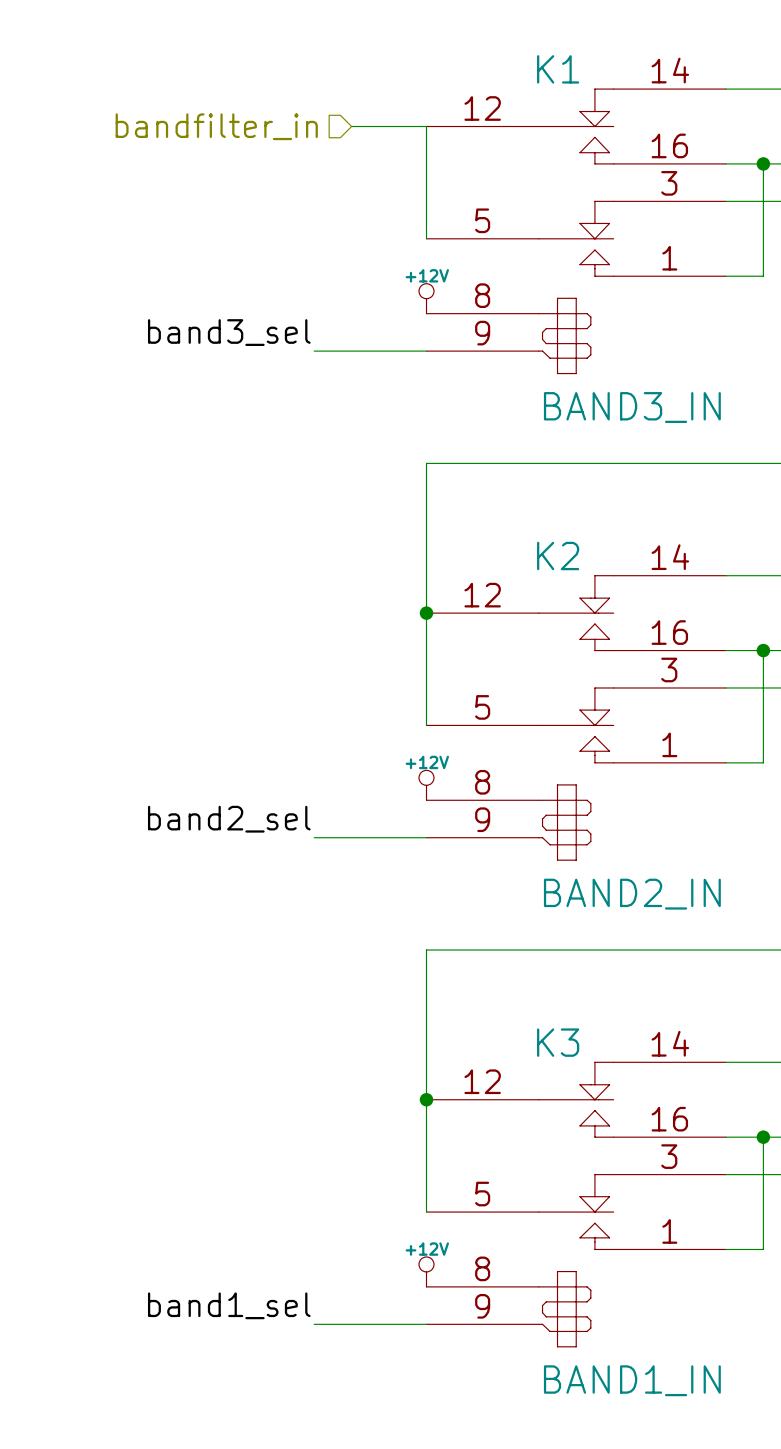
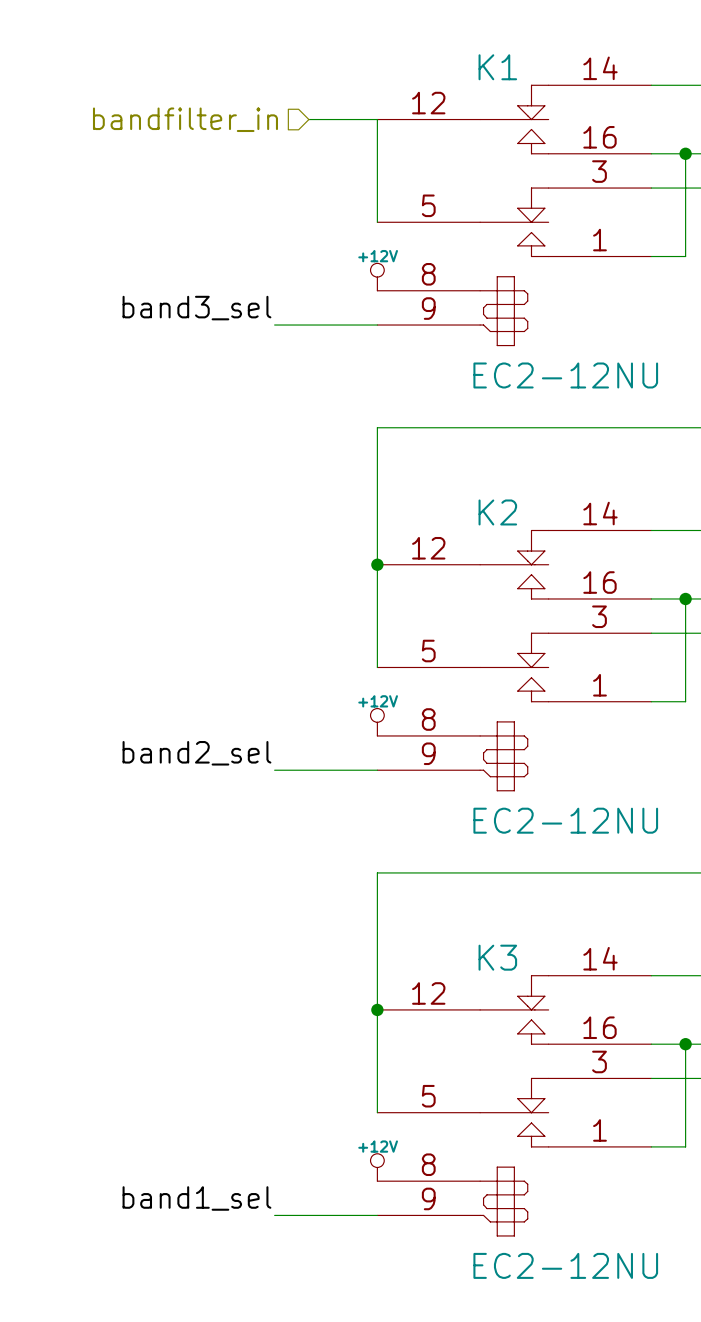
K1 value: BAND3_IN (632, 407) -> EC2-12NU (565, 375)
K2 value: BAND2_IN (632, 894) -> EC2-12NU (565, 820)
K3 value: BAND1_IN (632, 1380) -> EC2-12NU (565, 1265)

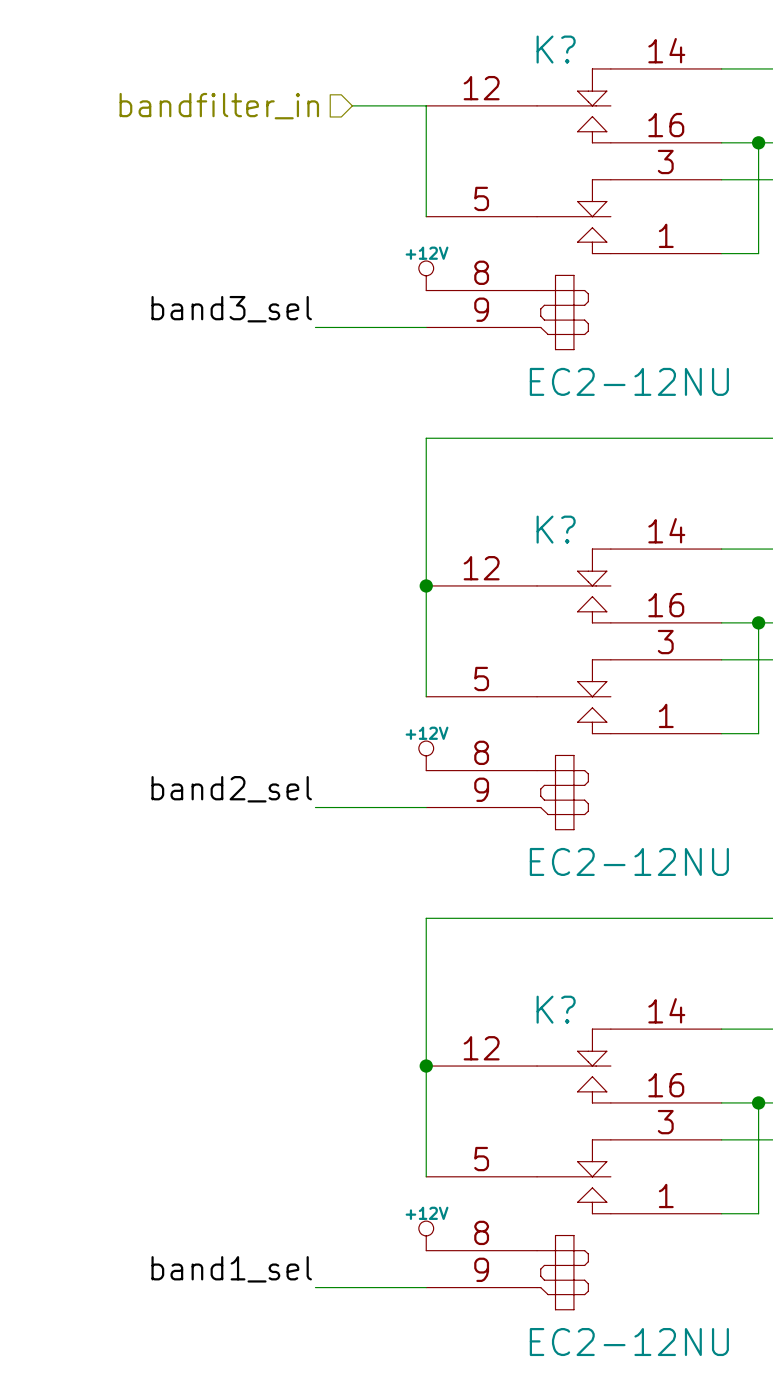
K1 name: K1 (497, 67) -> K? (556, 49)
K2 name: K2 (497, 512) -> K? (556, 529)
K3 name: K3 (497, 957) -> K? (556, 1009)

